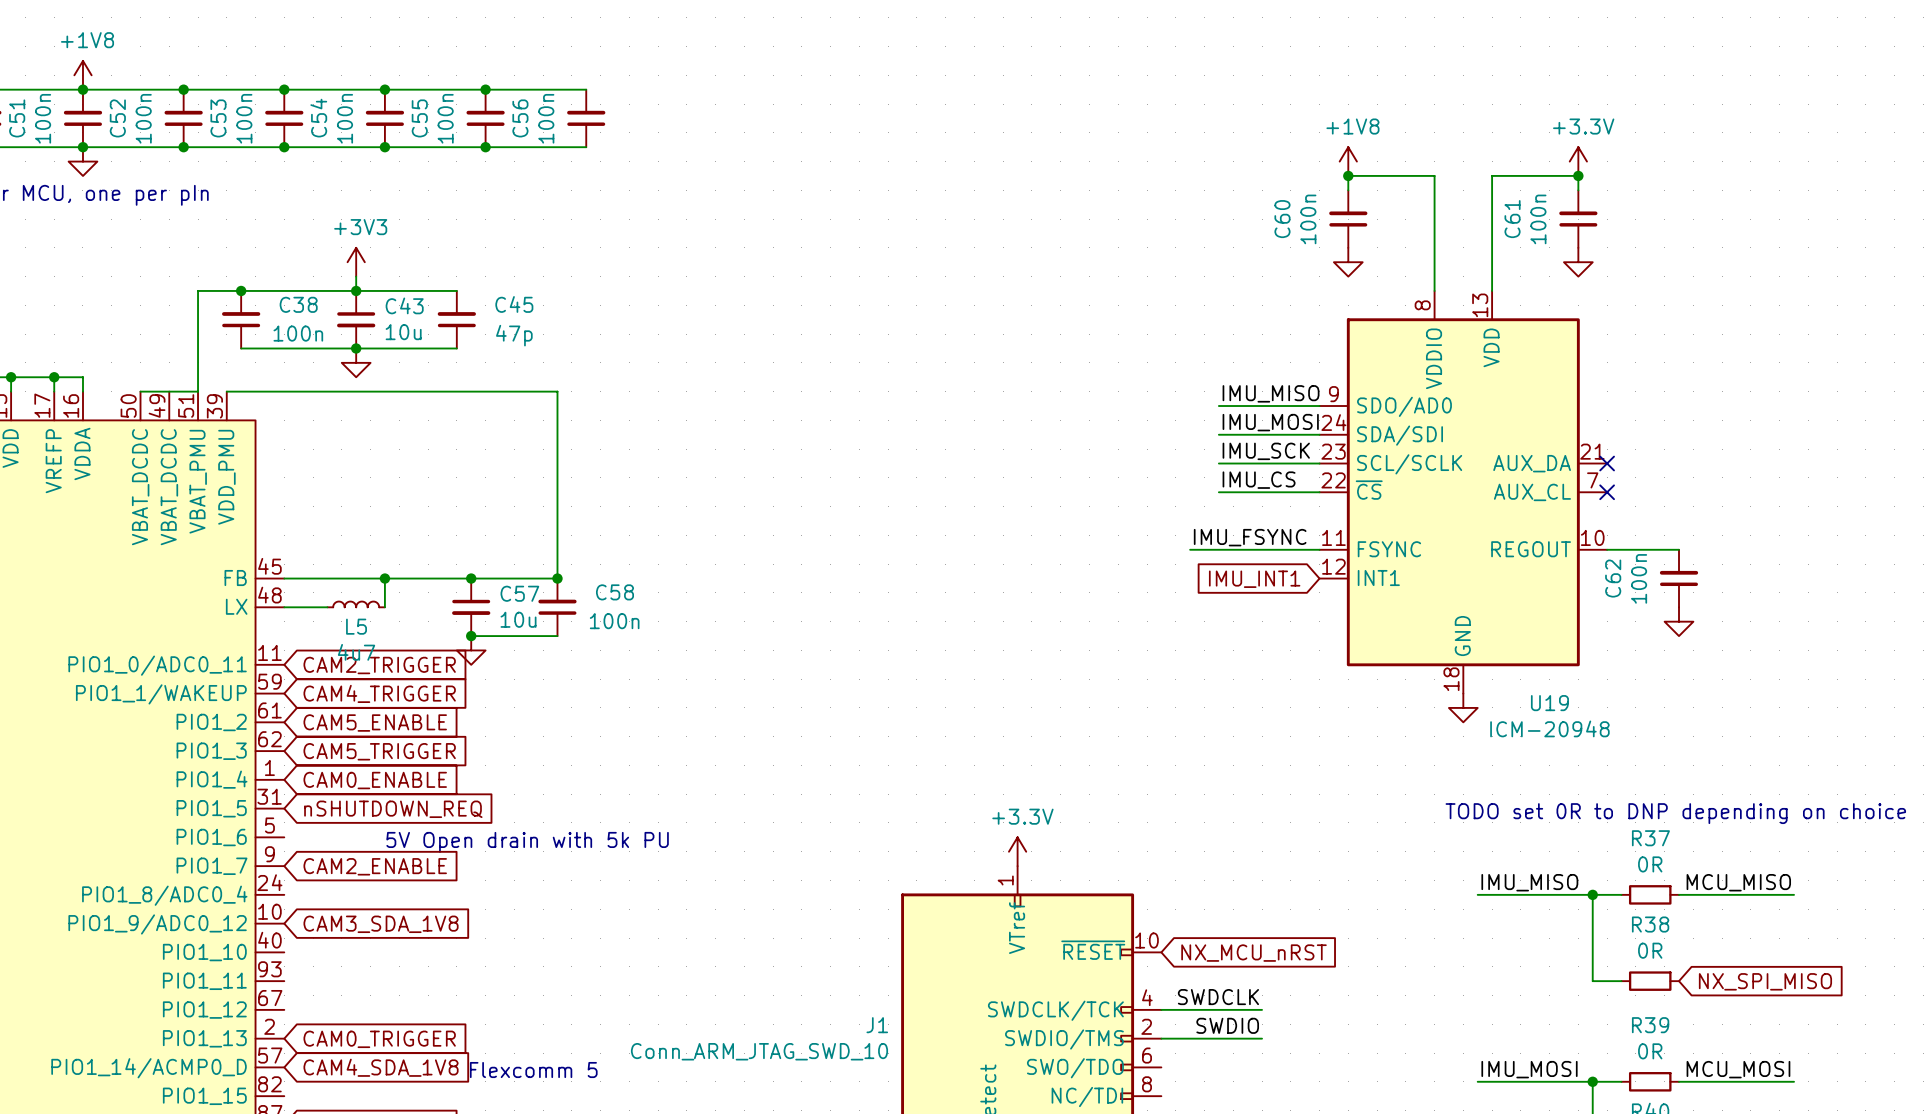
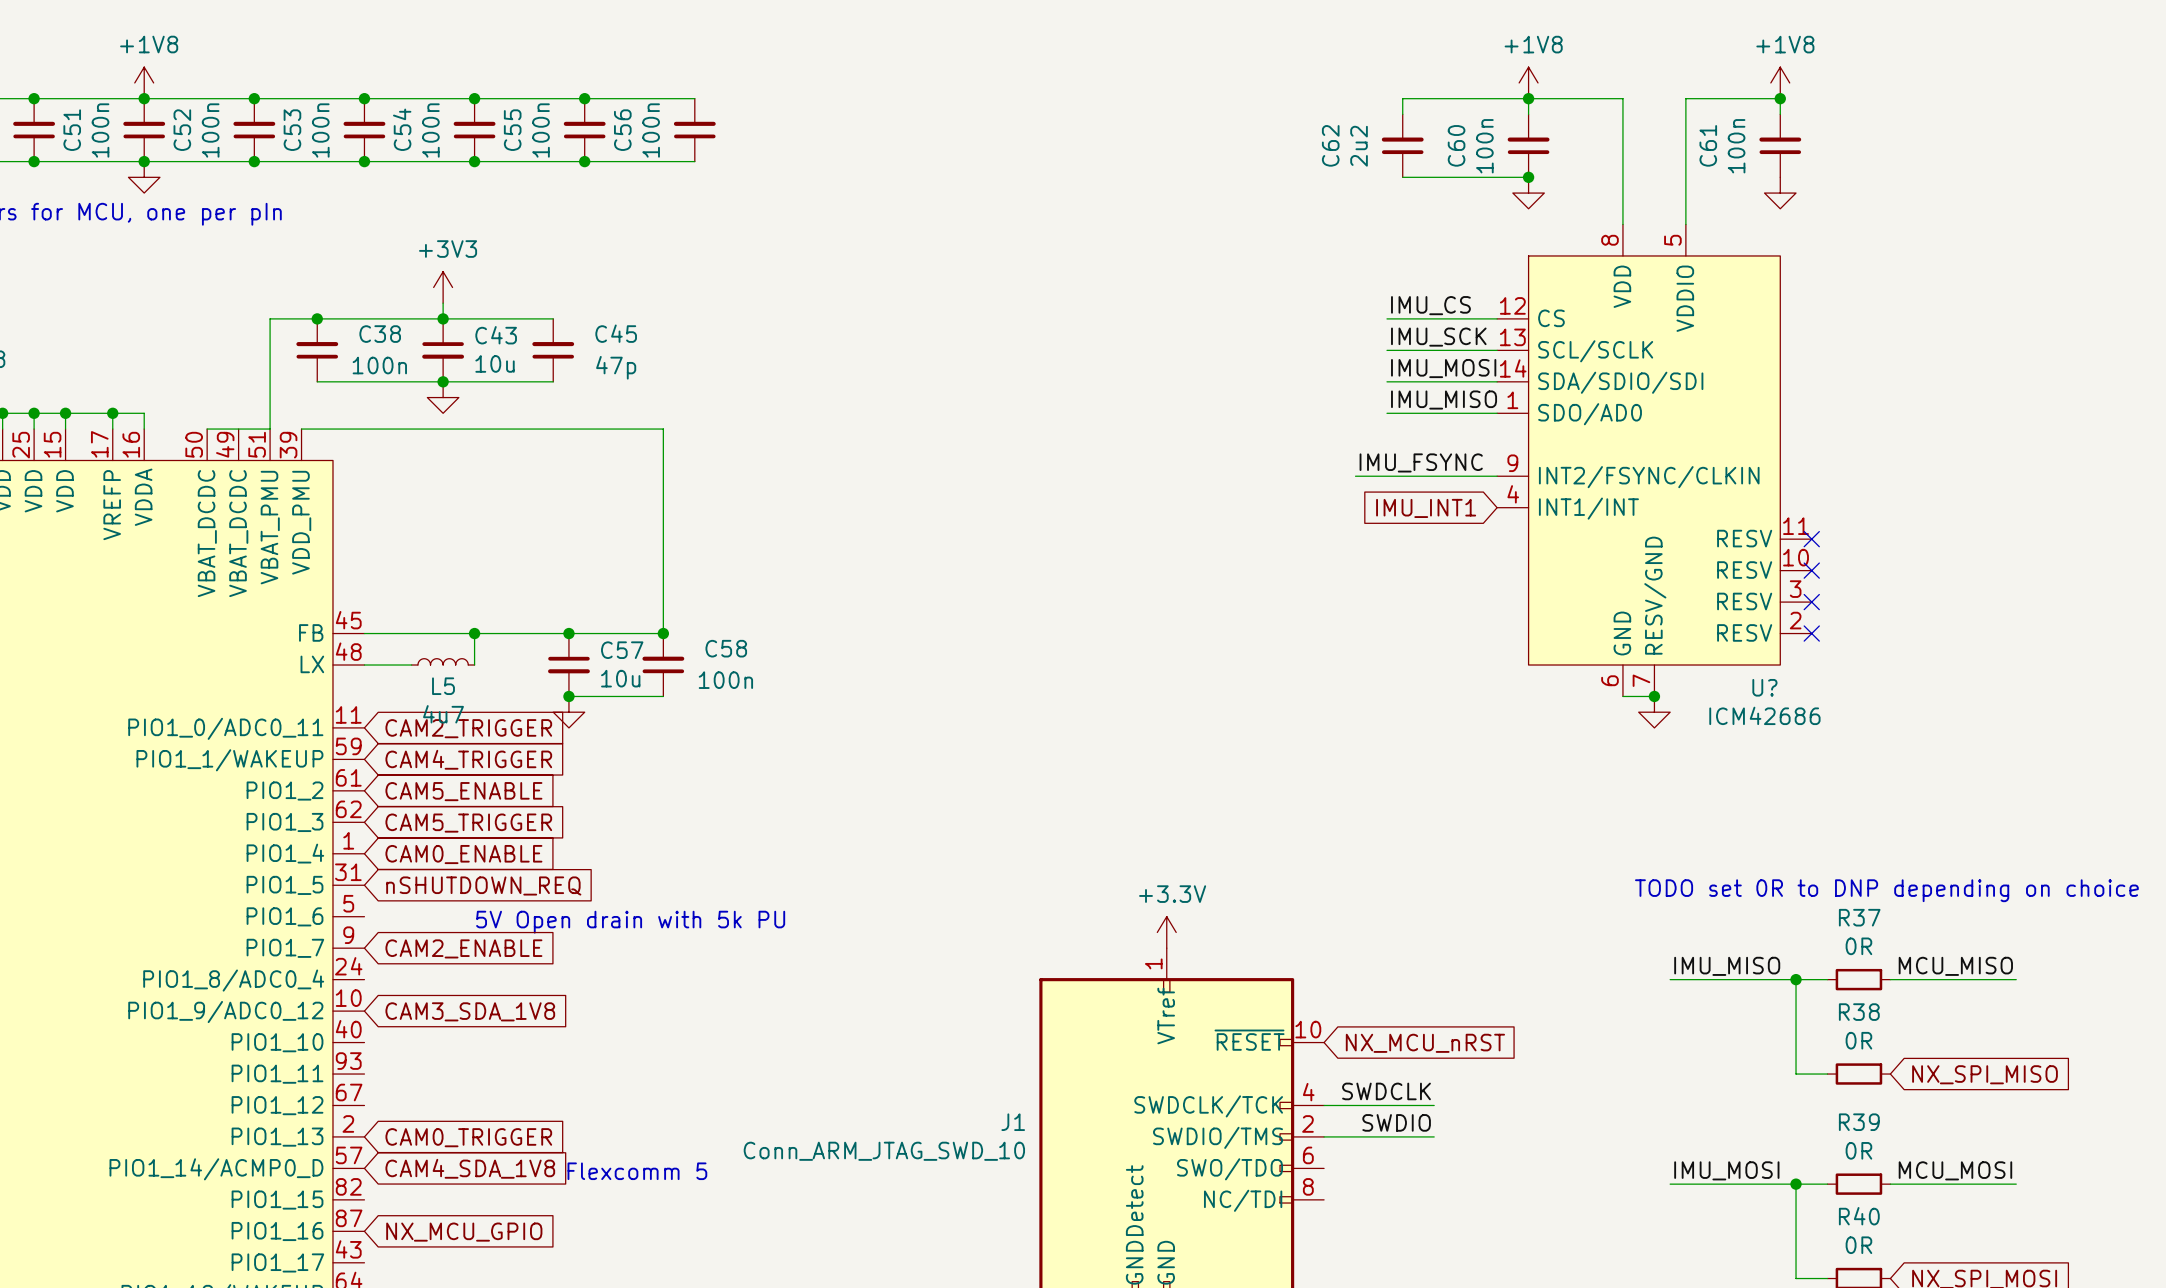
power symbol: none -> +1V8 (1780, 82)
wire: none -> (1528, 98) (1528, 114)
junction: none -> (1528, 98)
junction: none -> (1780, 98)
wire: none -> (1402, 177) (1528, 177)
power symbol position: +1V8 (1348, 161) -> +1V8 (1528, 82)
power symbol: +3.3V (1578, 161) -> none
junction position: (1348, 175) -> (1528, 177)
wire: (1434, 175) (1348, 175) (1348, 190) -> (1622, 193) (1622, 98) (1402, 98) (1402, 114)
wire: (1492, 175) (1578, 175) (1578, 190) -> (1685, 193) (1685, 98) (1780, 98) (1780, 114)
junction: (1578, 175) -> none
C60 position: (1348, 219) -> (1528, 145)
C61 position: (1578, 219) -> (1780, 145)
power symbol position: (1348, 262) -> (1528, 193)
power symbol position: (1578, 262) -> (1780, 193)
wire: none -> (1386, 350) (1497, 350)
label position: IMU_MISO (1271, 393) -> IMU_MISO (1444, 400)
wire: (1218, 406) (1319, 406) -> (1386, 318) (1497, 318)
U?: none -> ICM42686 (1654, 460)
label position: IMU_MOSI (1270, 422) -> IMU_MOSI (1443, 368)
wire: none -> (1355, 476) (1386, 476)
label position: IMU_SCK (1266, 451) -> IMU_SCK (1438, 337)
wire: (1218, 463) (1319, 463) -> (1386, 381) (1497, 381)
no-connect mark: (1607, 463) -> none
label position: IMU_CS (1259, 480) -> IMU_CS (1430, 305)
wire: (1218, 492) (1319, 492) -> (1386, 413) (1497, 413)
U19: ICM-20948 (1463, 492) -> none
no-connect mark: none -> (1811, 570)
label position: IMU_FSYNC (1250, 537) -> IMU_FSYNC (1421, 462)
wire: (1190, 549) (1319, 549) -> none
wire: (1607, 549) (1679, 549) -> none
no-connect mark: none -> (1811, 602)
no-connect mark: none -> (1811, 633)
C62 value: 100n (1639, 578) -> 2u2 (1359, 146)
C62 position: (1679, 578) -> (1402, 145)
global label position: IMU_INT1 (1254, 579) -> IMU_INT1 (1426, 508)
power symbol: (1679, 621) -> none
junction: none -> (1654, 696)
power symbol position: (1463, 707) -> (1654, 712)

